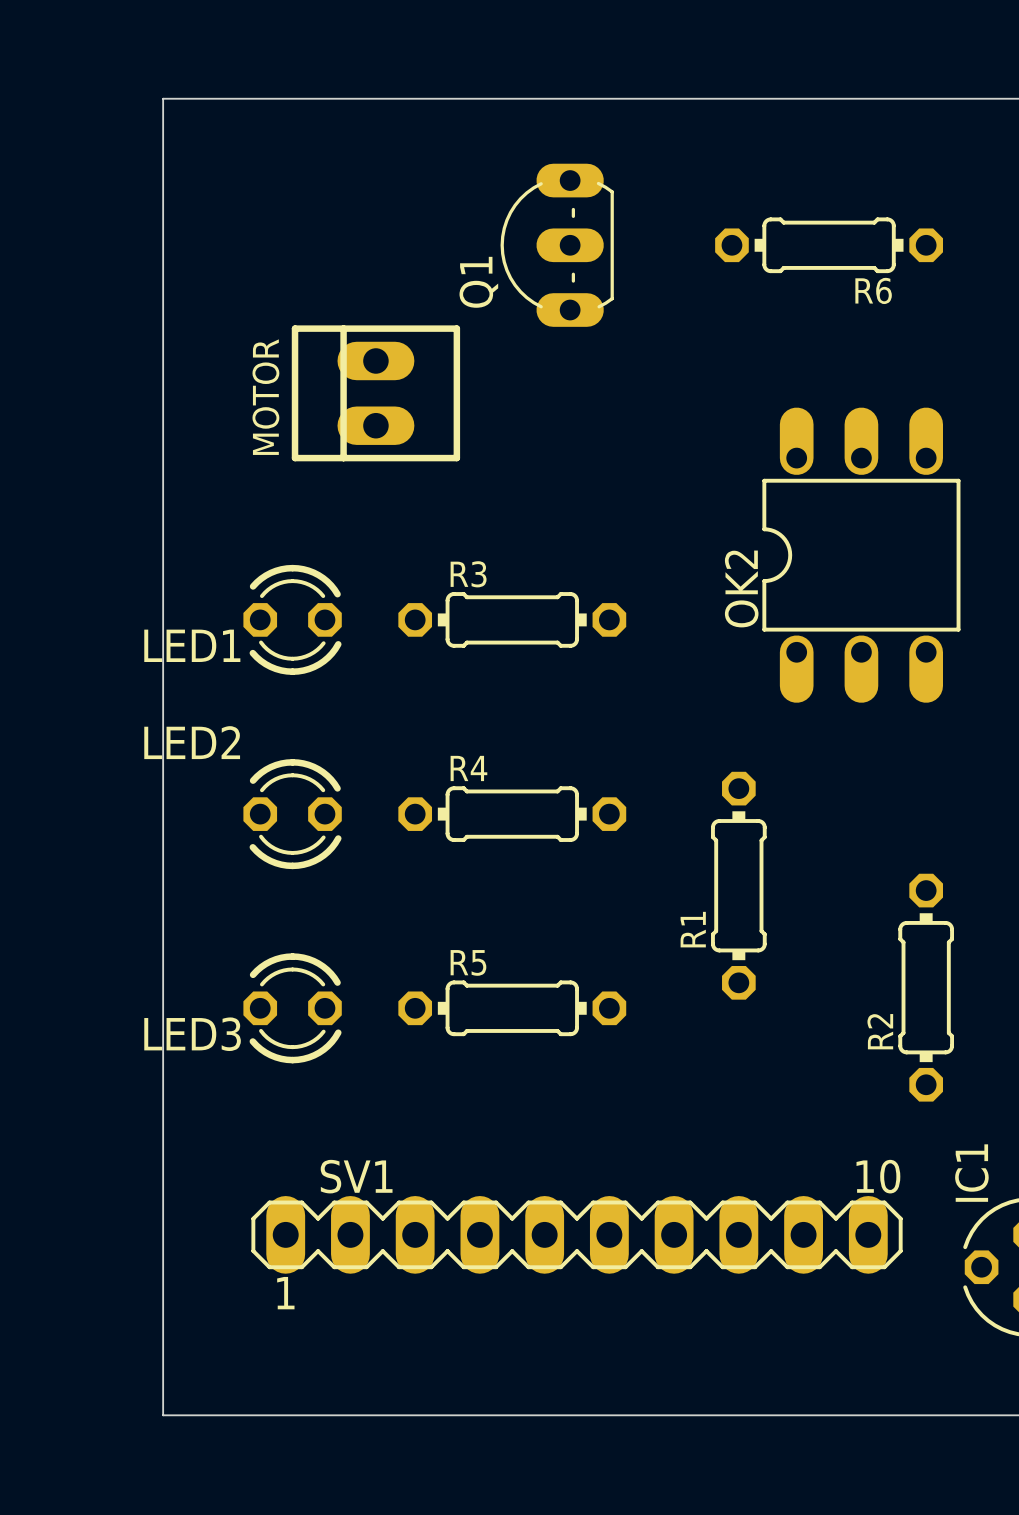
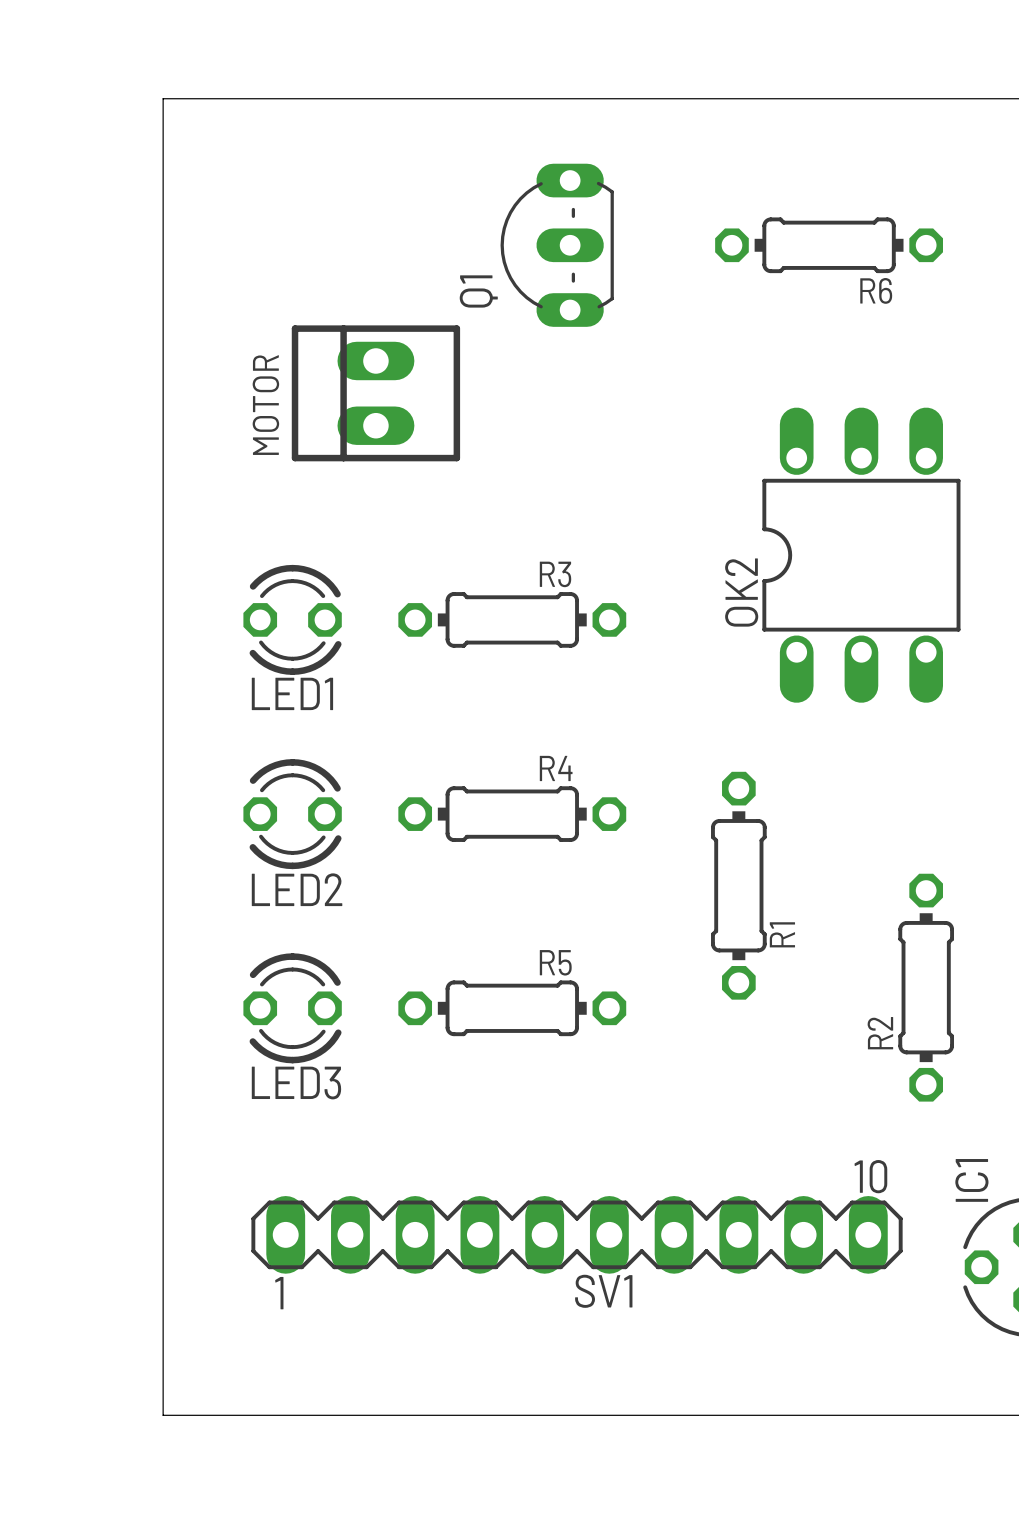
R3 name position: R3 (468, 574) -> R3 (555, 574)
LED1 name position: LED1 (192, 645) -> LED1 (292, 693)
LED2 name position: LED2 (192, 742) -> LED2 (297, 889)
R4 name position: R4 (468, 768) -> R4 (556, 768)
R1 name position: R1 (693, 929) -> R1 (782, 934)
R5 name position: R5 (468, 962) -> R5 (555, 962)
LED3 name position: LED3 (192, 1034) -> LED3 (296, 1083)
SV1 name position: SV1 (356, 1176) -> SV1 (603, 1291)

